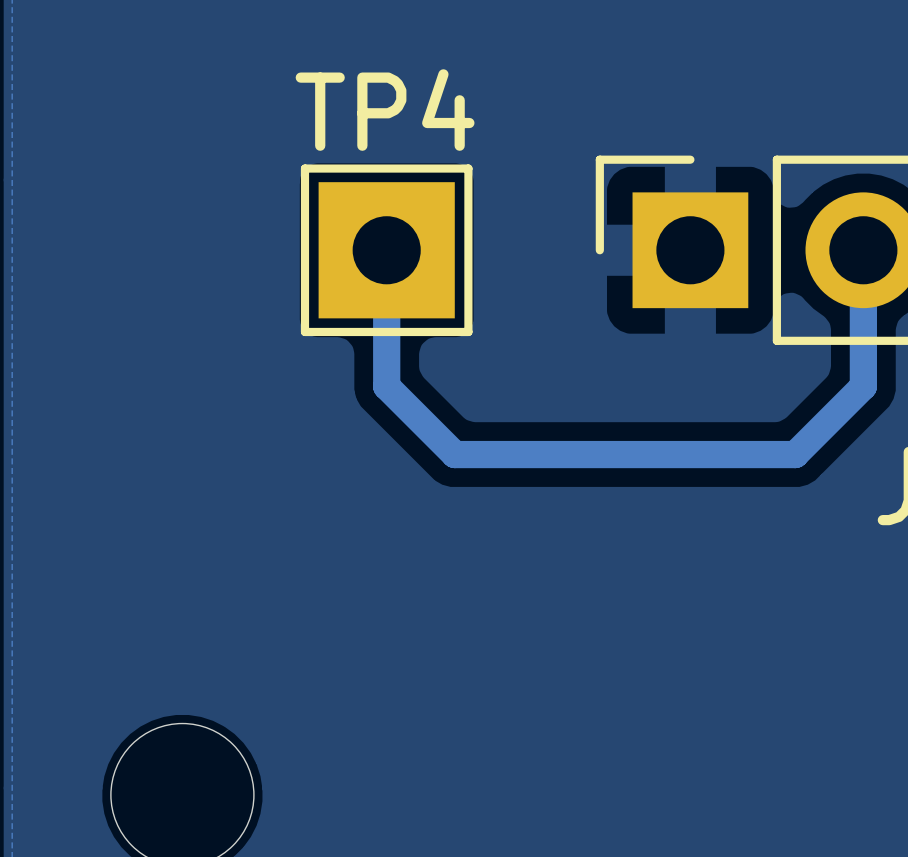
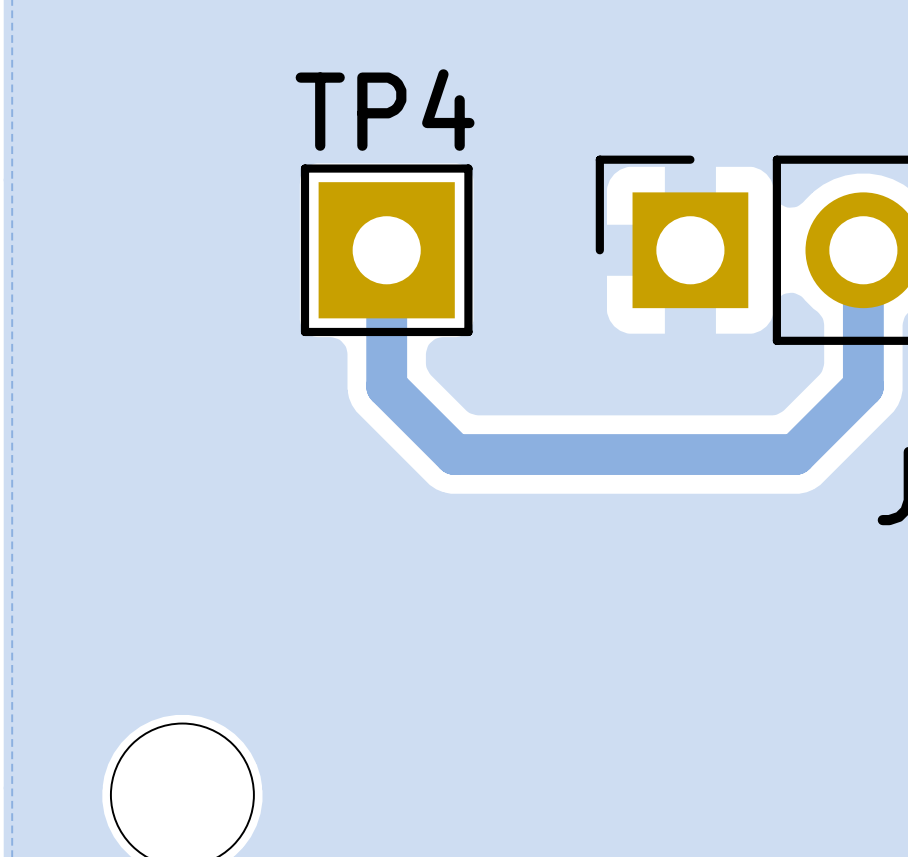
bottom track width: thin (386, 250) (386, 386) (454, 454) (795, 454) (863, 386) (863, 250) -> thick (386, 250) (386, 386) (454, 454) (795, 454) (863, 386) (863, 250)

